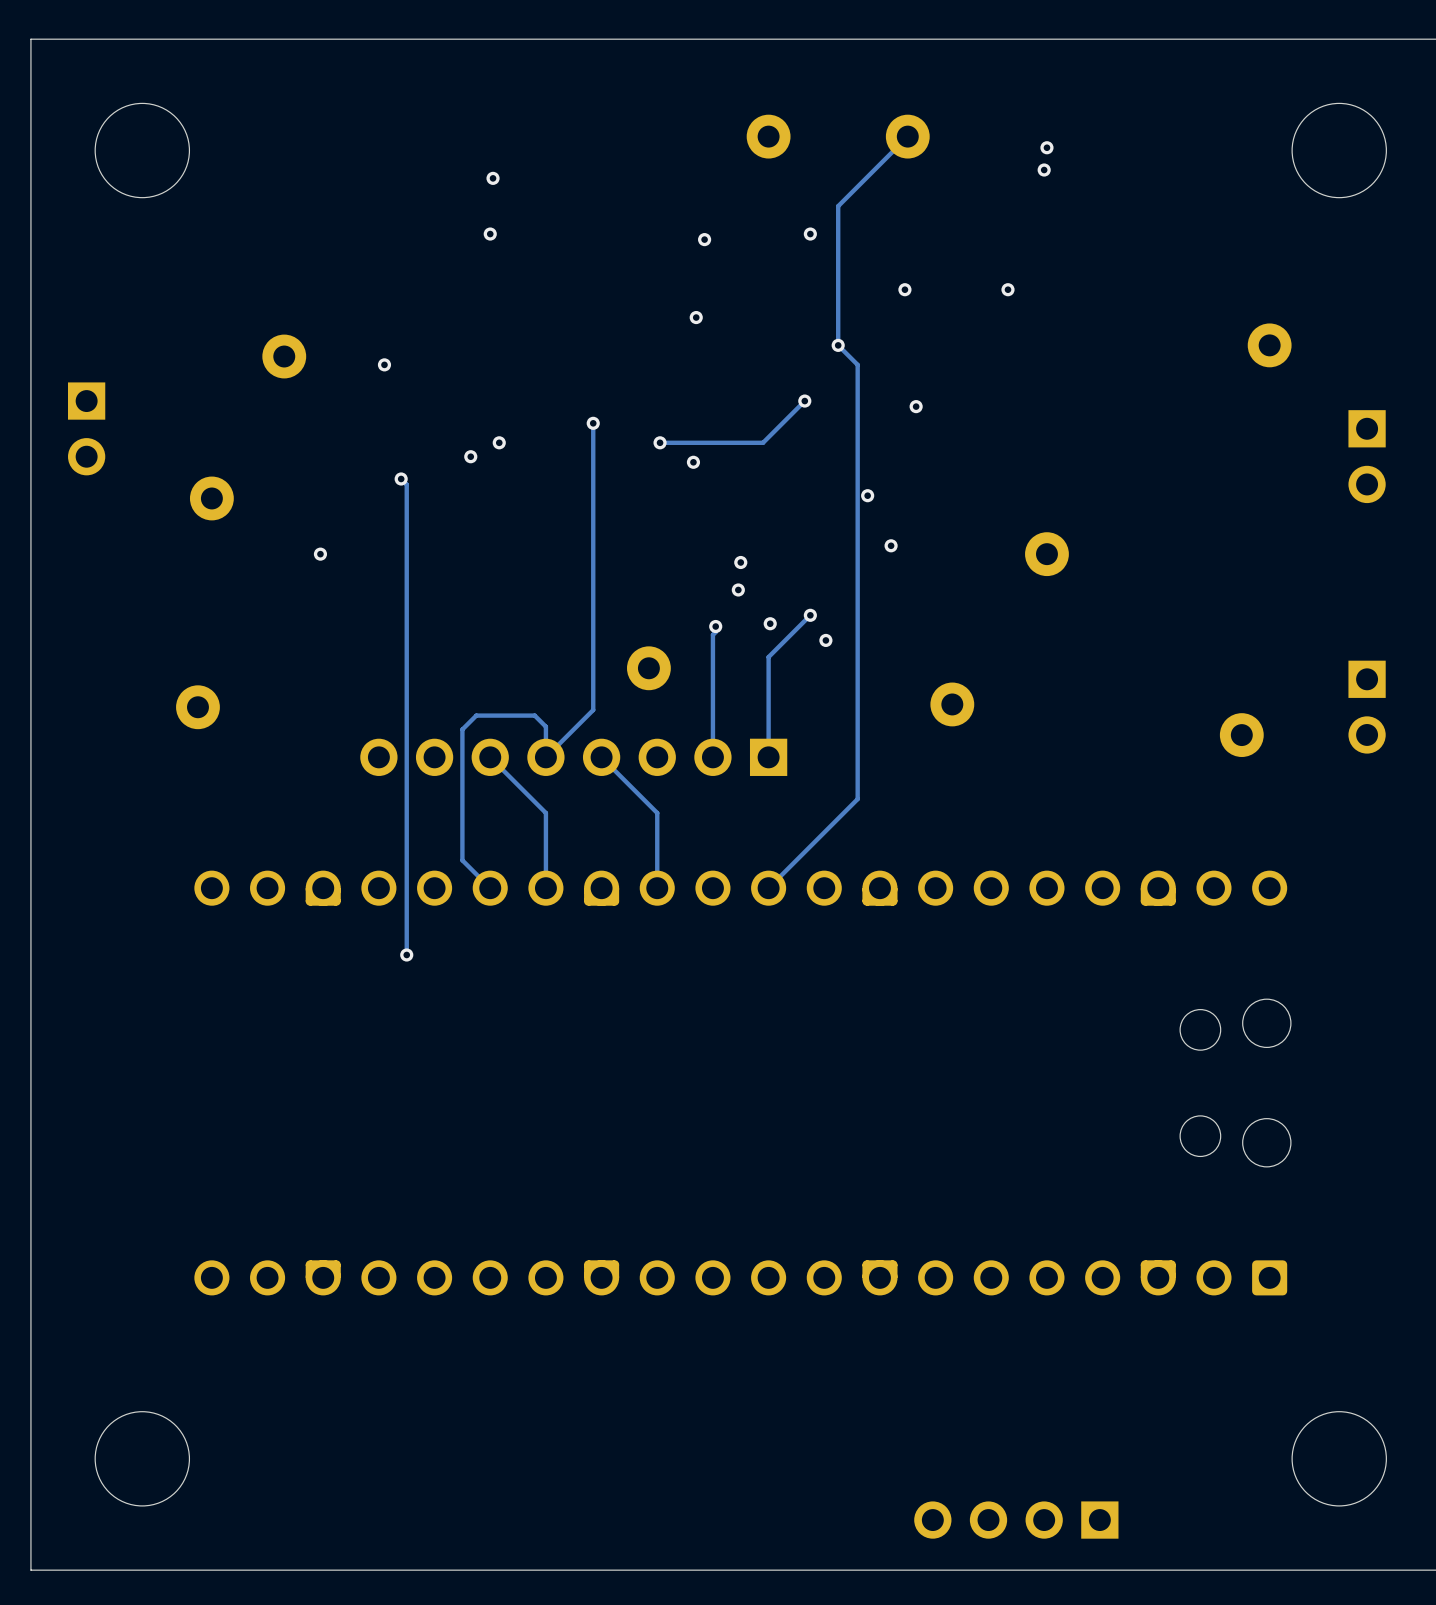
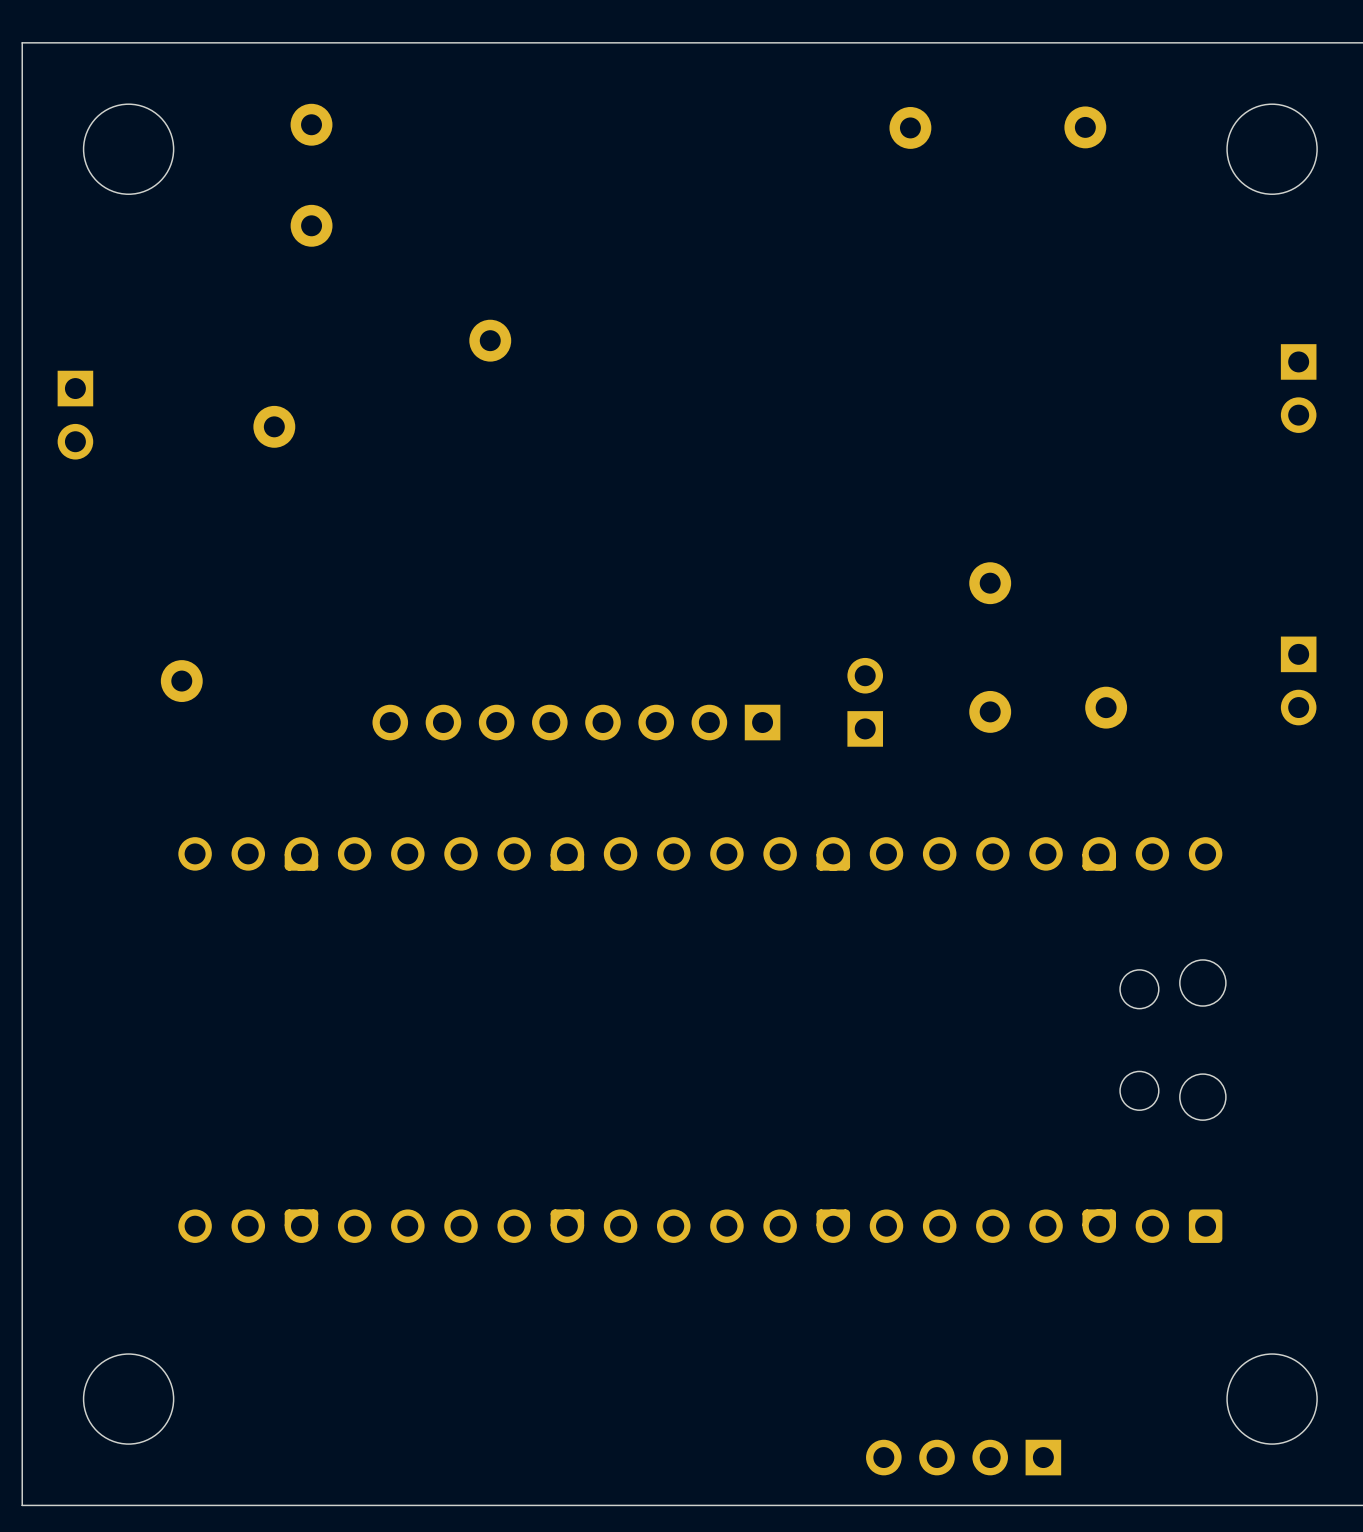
part: none -> (311, 124)
part: none -> (1085, 127)
part: (768, 136) -> none
track: (907, 136) (838, 206) (838, 345) (857, 364) (857, 799) (768, 888) -> none
part position: (907, 136) -> (910, 127)
via: (1046, 147) -> none
via: (1044, 170) -> none
via: (493, 178) -> none
part: none -> (311, 225)
via: (490, 234) -> none
via: (810, 234) -> none
via: (704, 239) -> none
via: (904, 289) -> none
via: (1007, 289) -> none
via: (696, 317) -> none
via: (838, 345) -> none
part: (1269, 345) -> none
part: none -> (490, 340)
part: (284, 356) -> none
via: (384, 364) -> none
track: (804, 401) (763, 442) (660, 442) -> none
via: (804, 401) -> none
via: (916, 406) -> none
track: (593, 423) (593, 710) (545, 757) (545, 726) (534, 715) (476, 715) (462, 729) (462, 860) (490, 888) -> none
via: (593, 423) -> none
part: none -> (274, 426)
via: (499, 442) -> none
via: (660, 442) -> none
via: (470, 456) -> none
part position: (1367, 456) -> (1298, 388)
via: (693, 462) -> none
track: (401, 478) (406, 484) (406, 954) -> none
via: (401, 478) -> none
via: (867, 495) -> none
part: (211, 498) -> none
via: (891, 545) -> none
via: (320, 554) -> none
part position: (1046, 554) -> (990, 583)
via: (740, 562) -> none
via: (738, 589) -> none
track: (810, 615) (768, 657) (768, 757) -> none
via: (810, 615) -> none
via: (770, 623) -> none
track: (715, 626) (715, 632) (712, 634) (712, 757) -> none
via: (715, 626) -> none
via: (825, 640) -> none
part: (648, 668) -> none
part: (952, 704) -> none
part: none -> (865, 702)
part position: (1241, 735) -> (1106, 707)
part: none -> (990, 711)
track: (490, 757) (545, 813) (545, 888) -> none
part position: (573, 757) -> (576, 722)
track: (601, 757) (657, 813) (657, 888) -> none
via: (406, 954) -> none

